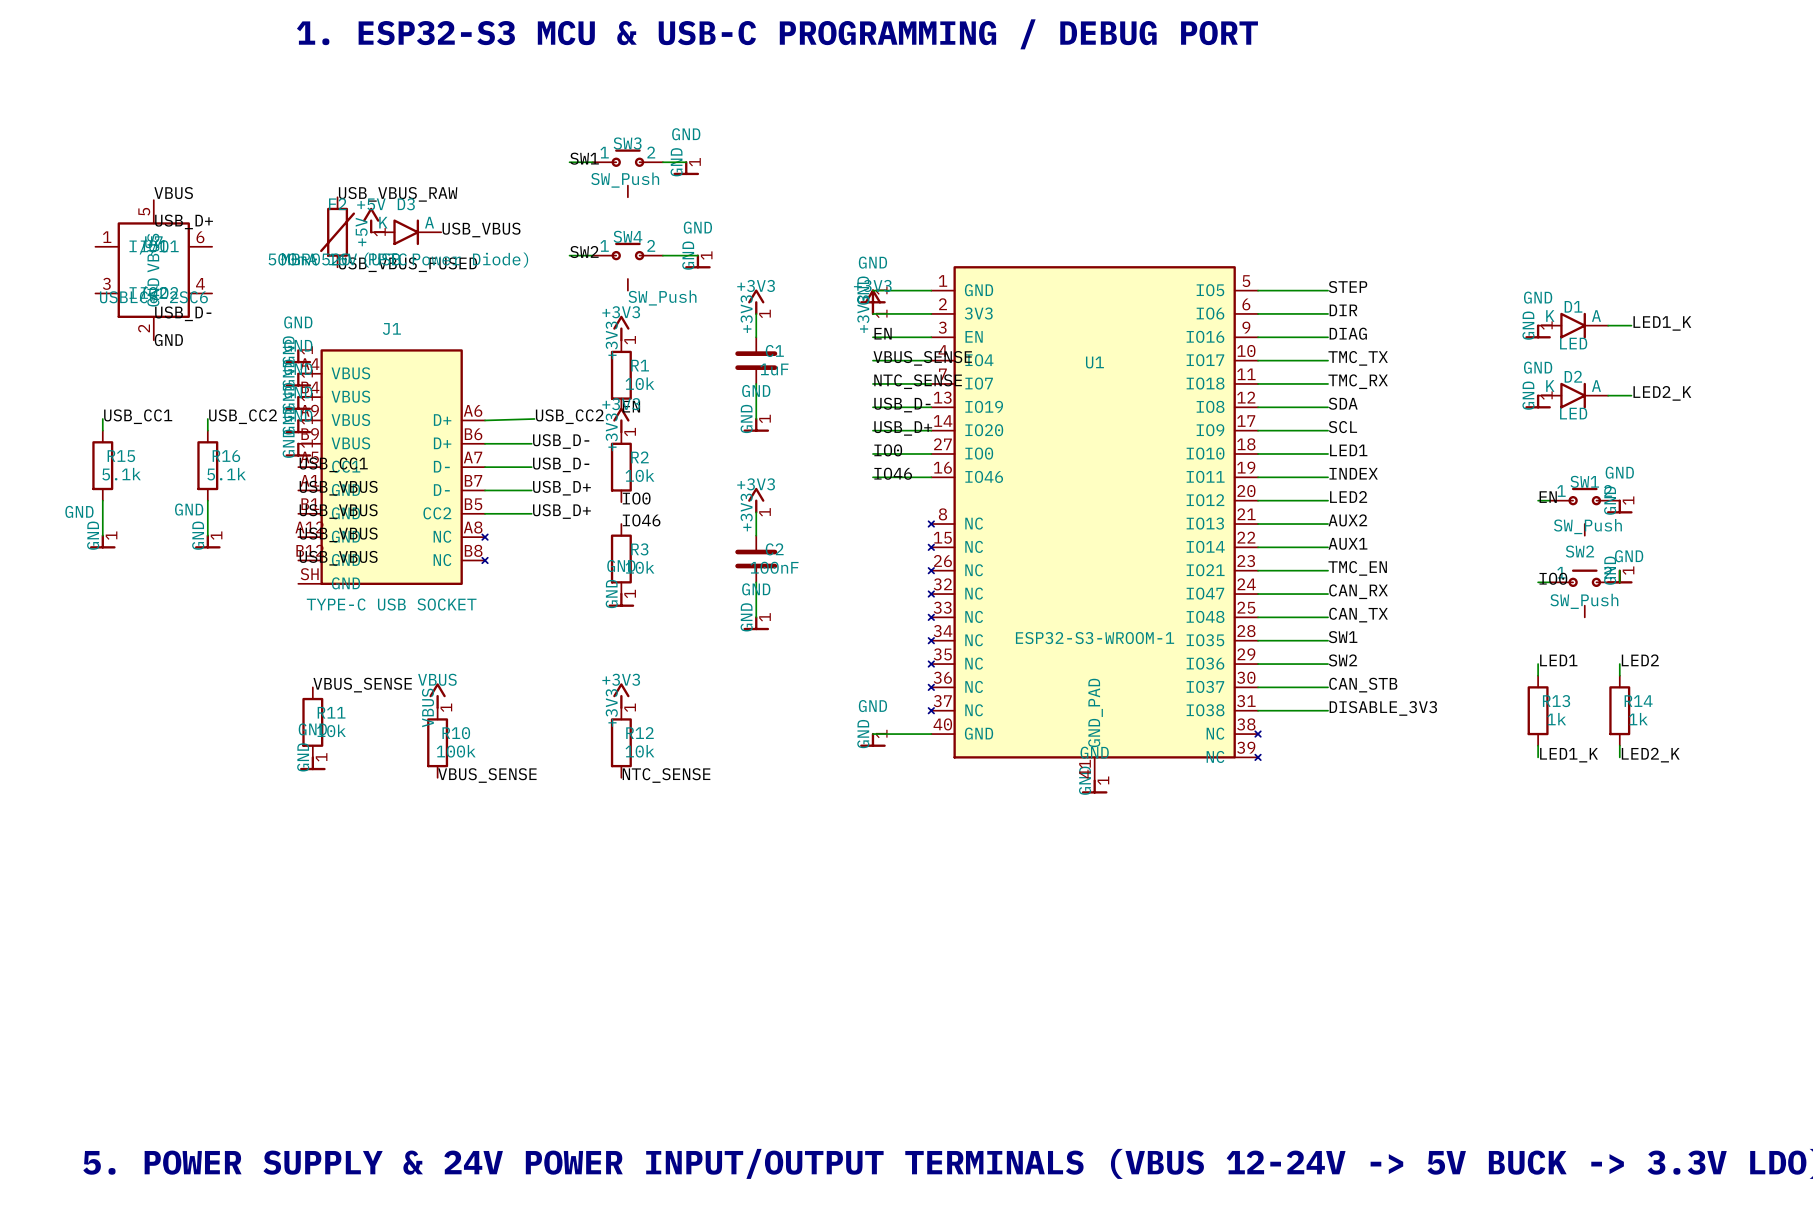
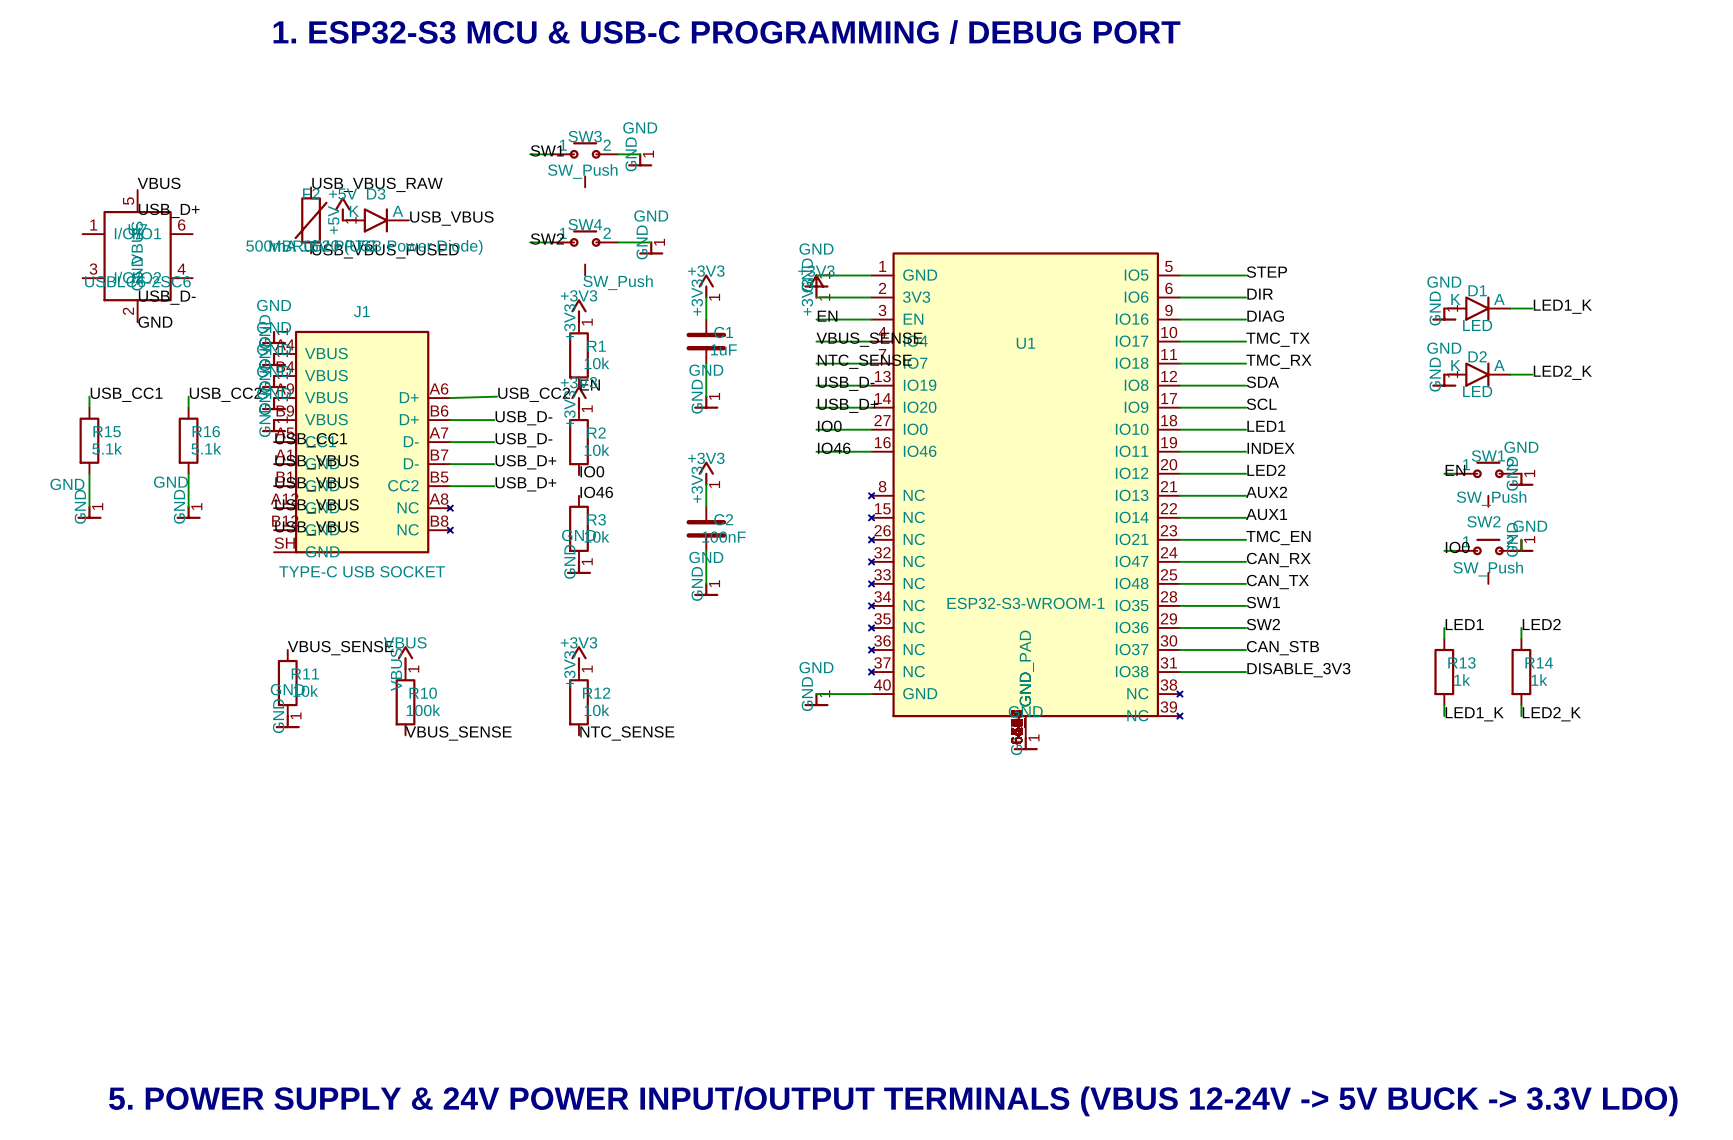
U1 symbol: [928, 266, 1261, 781] -> [868, 252, 1183, 739]

